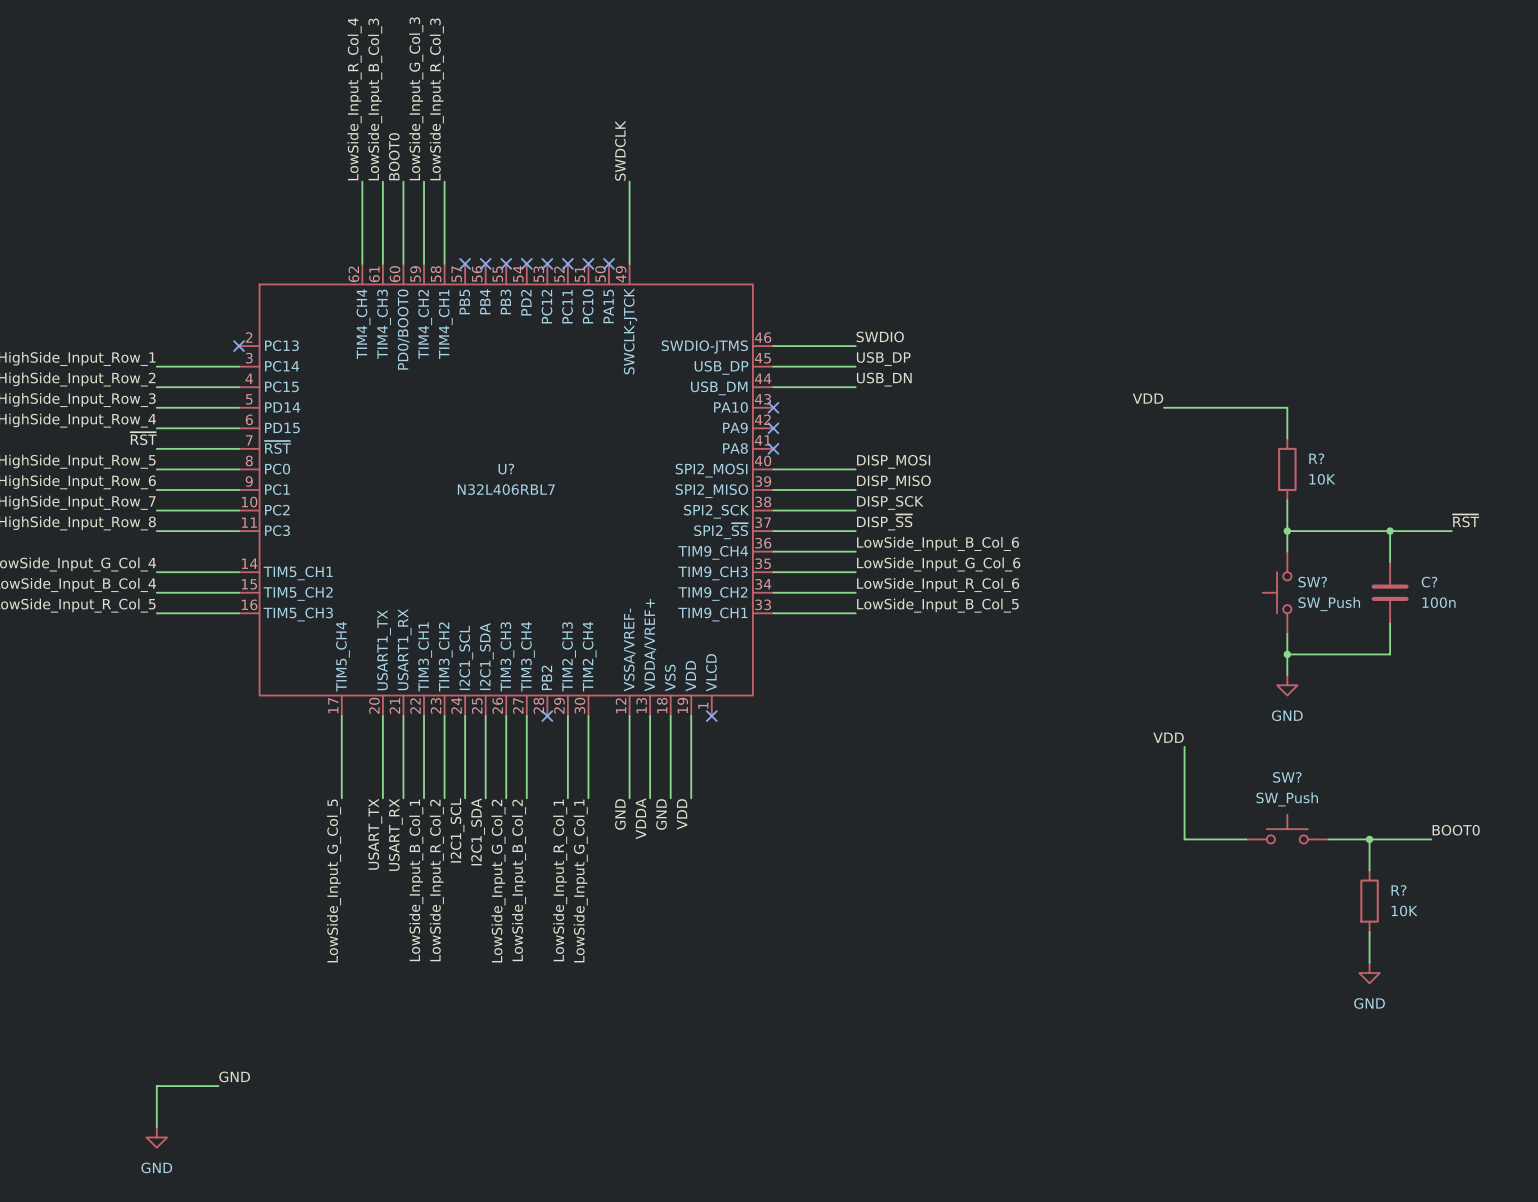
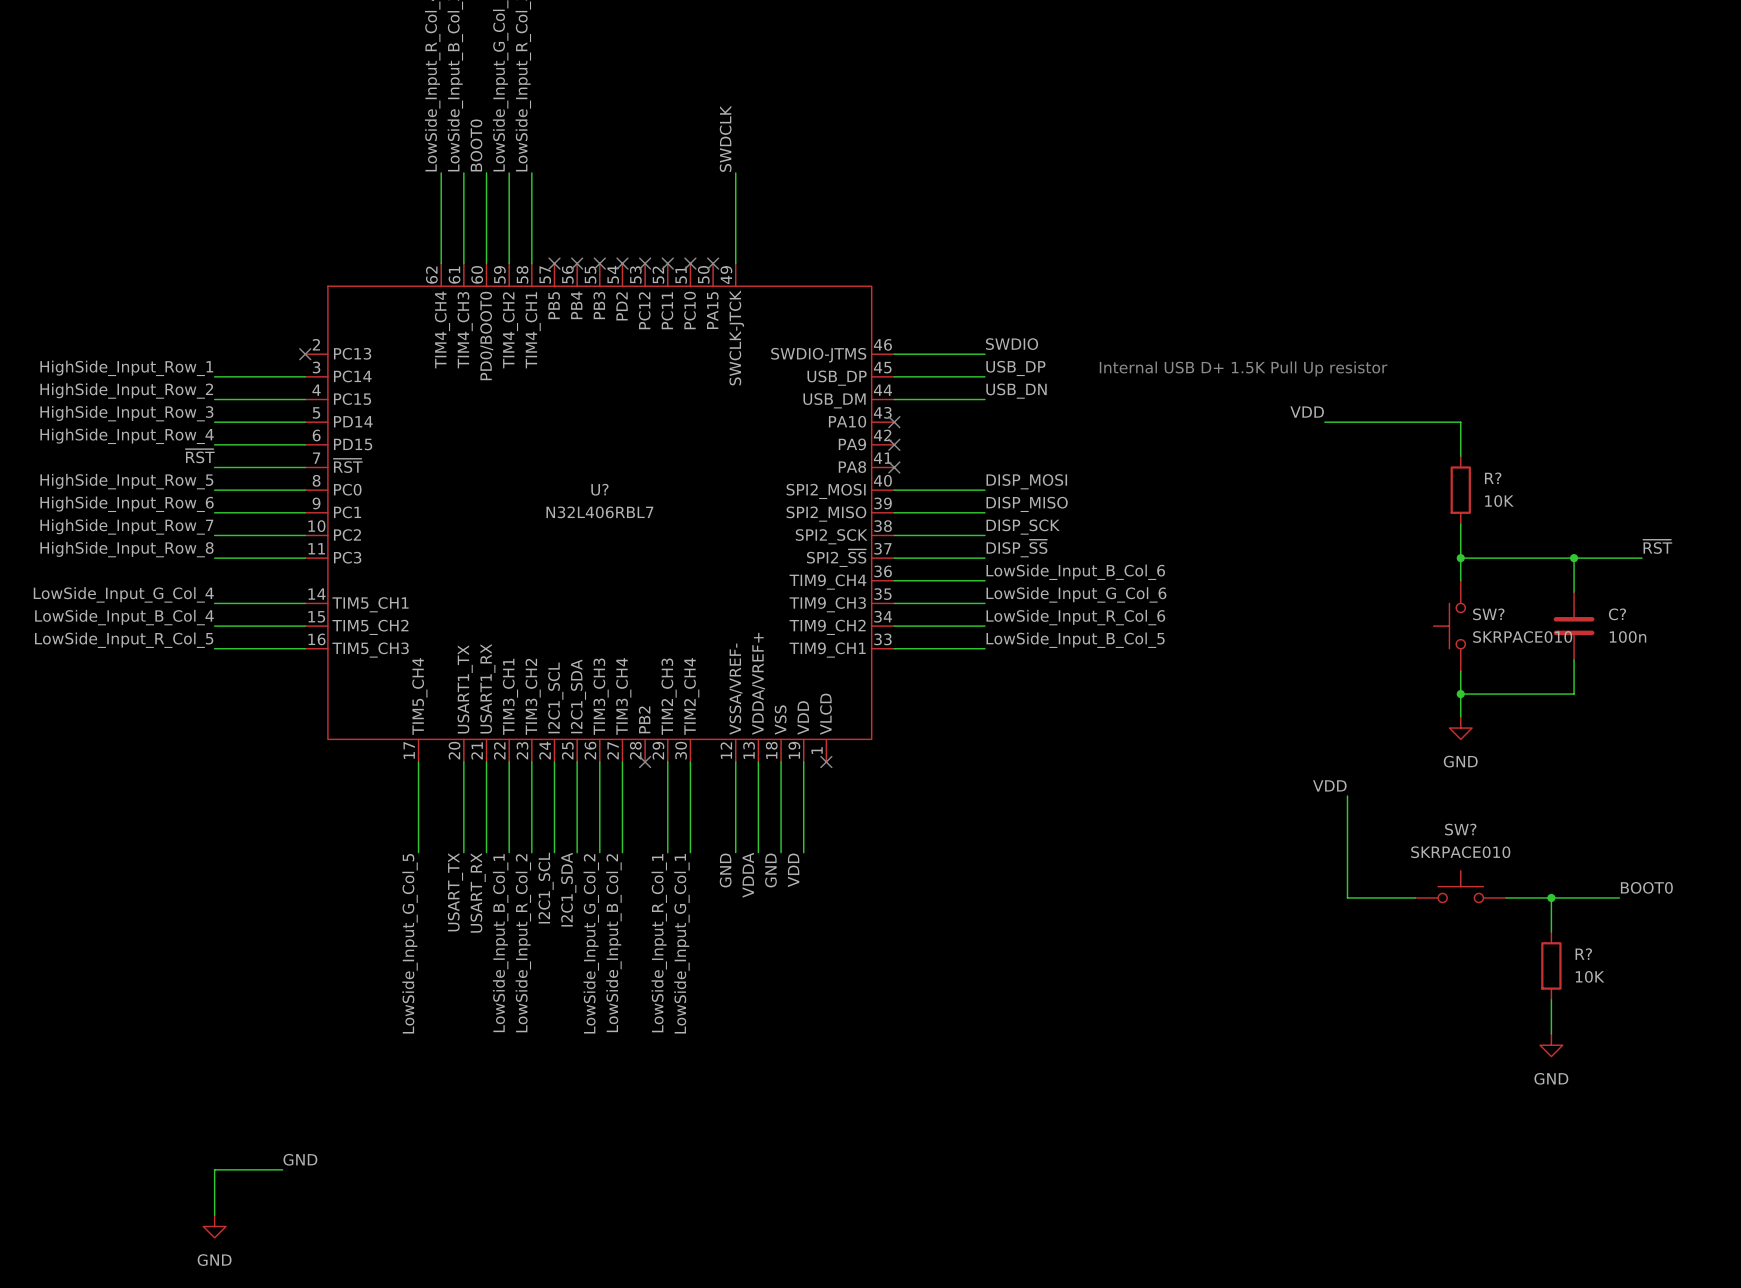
text: none -> Internal USB D+ 1.5K Pull Up resistor (1243, 368)
SW? value: SW_Push (1329, 604) -> SKRPACE010 (1522, 637)
SW? value: SW_Push (1287, 799) -> SKRPACE010 (1460, 852)

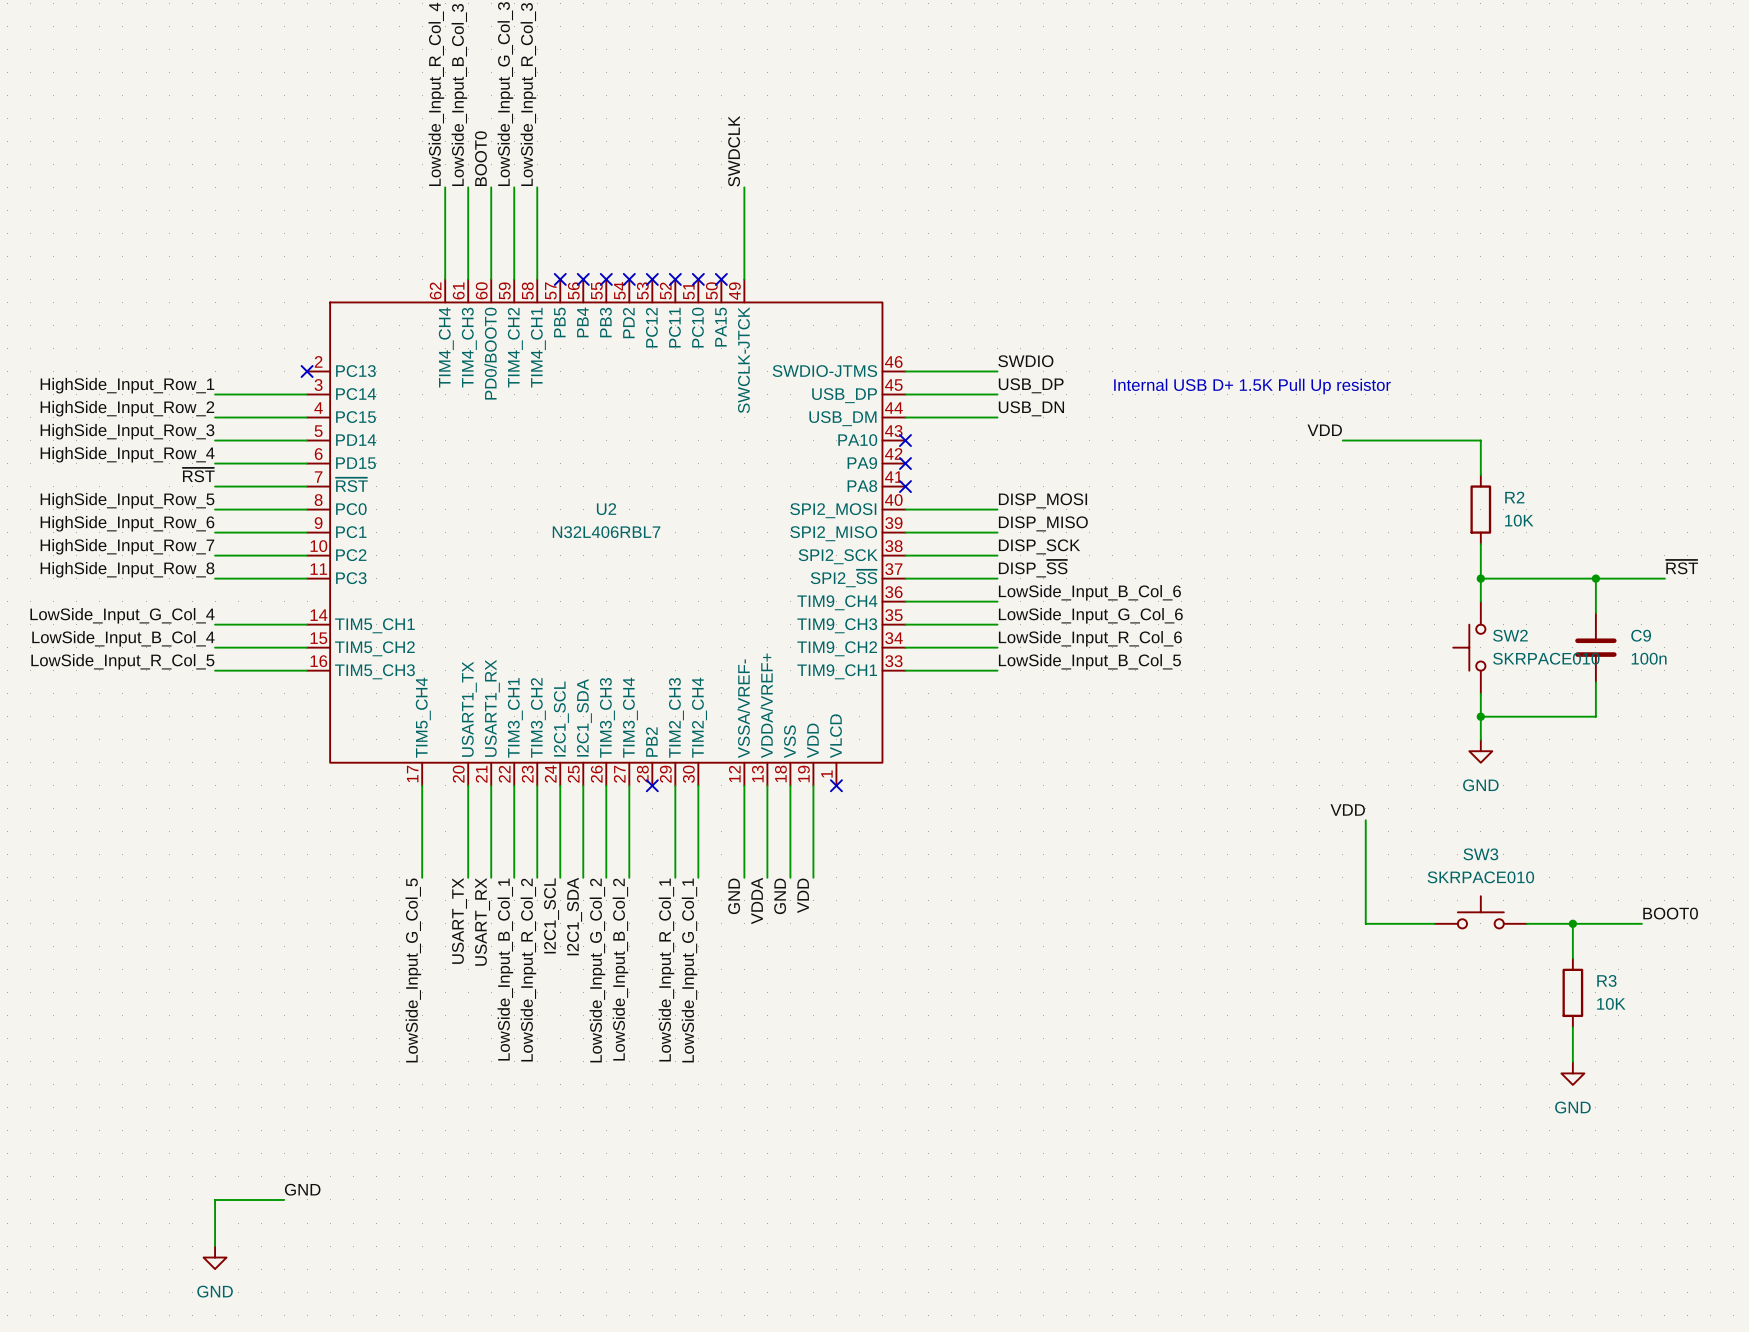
R? name: R? (1493, 478) -> R2 (1514, 497)
U? name: U? (599, 489) -> U2 (606, 509)
SW? name: SW? (1488, 614) -> SW2 (1510, 635)
C? name: C? (1617, 614) -> C9 (1641, 635)
SW? name: SW? (1460, 829) -> SW3 (1480, 854)
R? name: R? (1583, 954) -> R3 (1606, 980)

